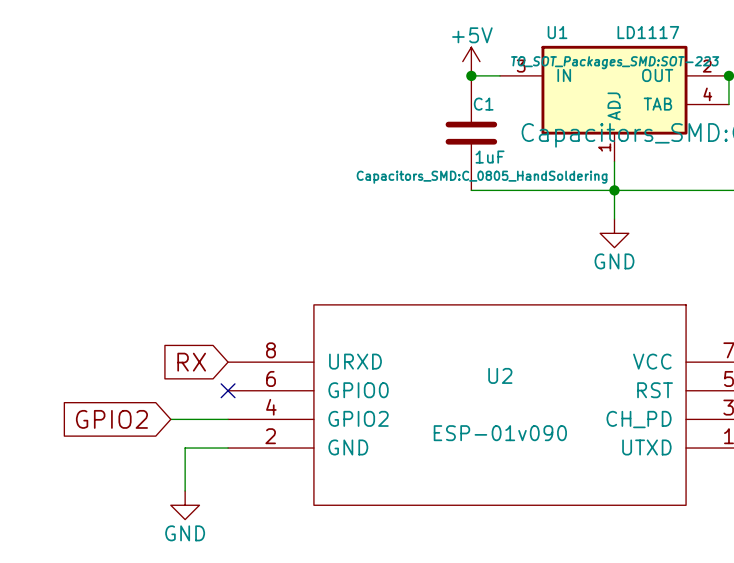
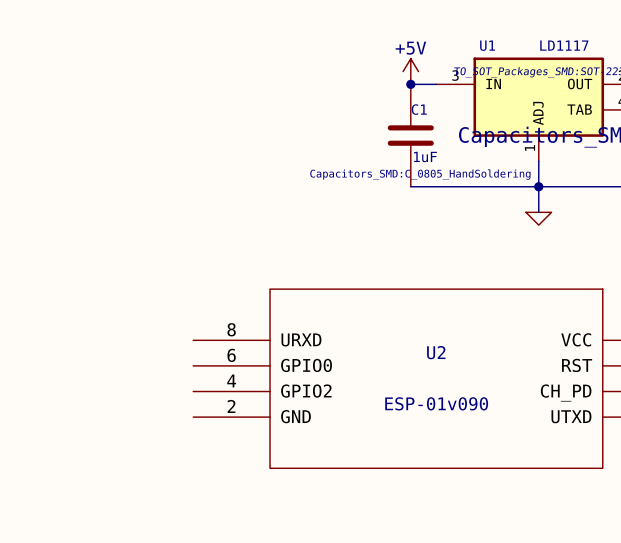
power symbol shape: [600, 219, 629, 248] -> [525, 212, 552, 226]
power symbol text: GND (614, 261) -> none
global label: RX (191, 362) -> none
no-connect mark: (228, 390) -> none
global label: GPIO2 (111, 419) -> none
wire: (170, 419) (228, 419) -> none
wire: (228, 448) (185, 448) (185, 490) -> none
power symbol: GND (185, 505) -> none

